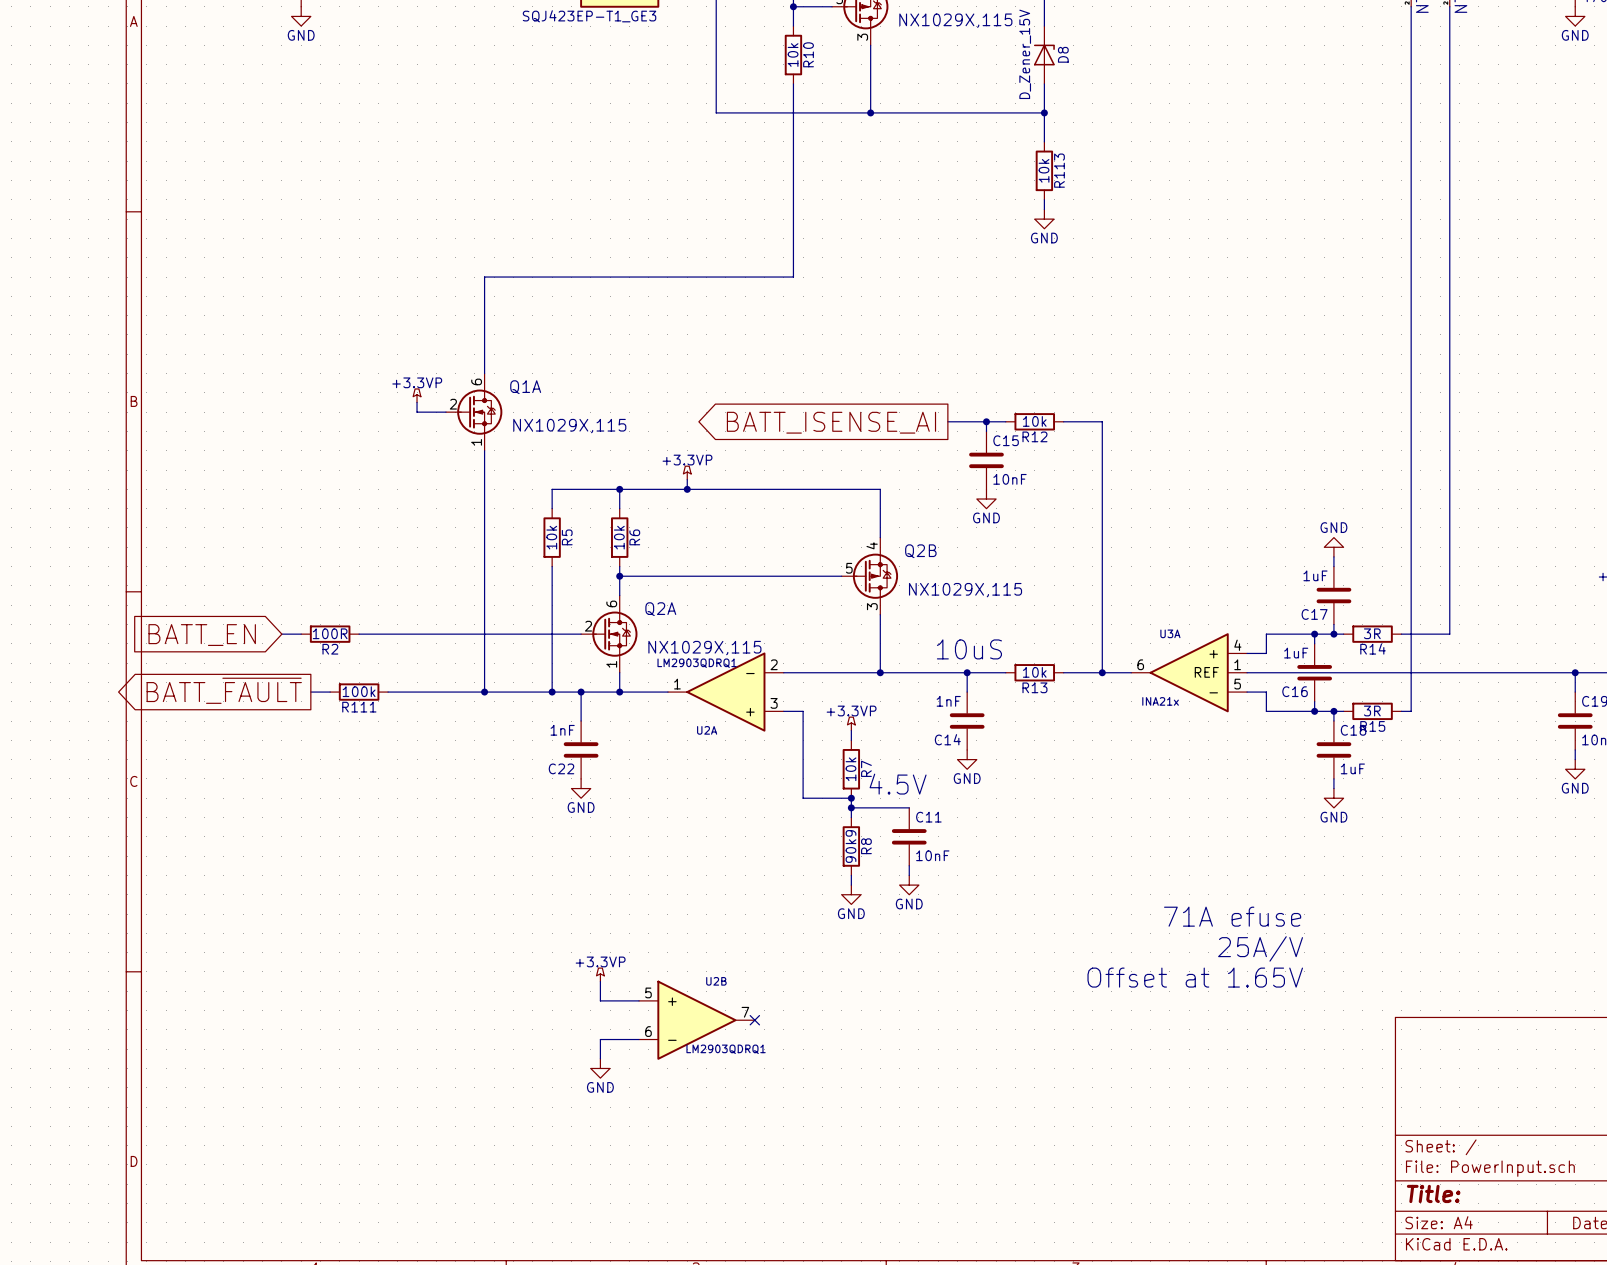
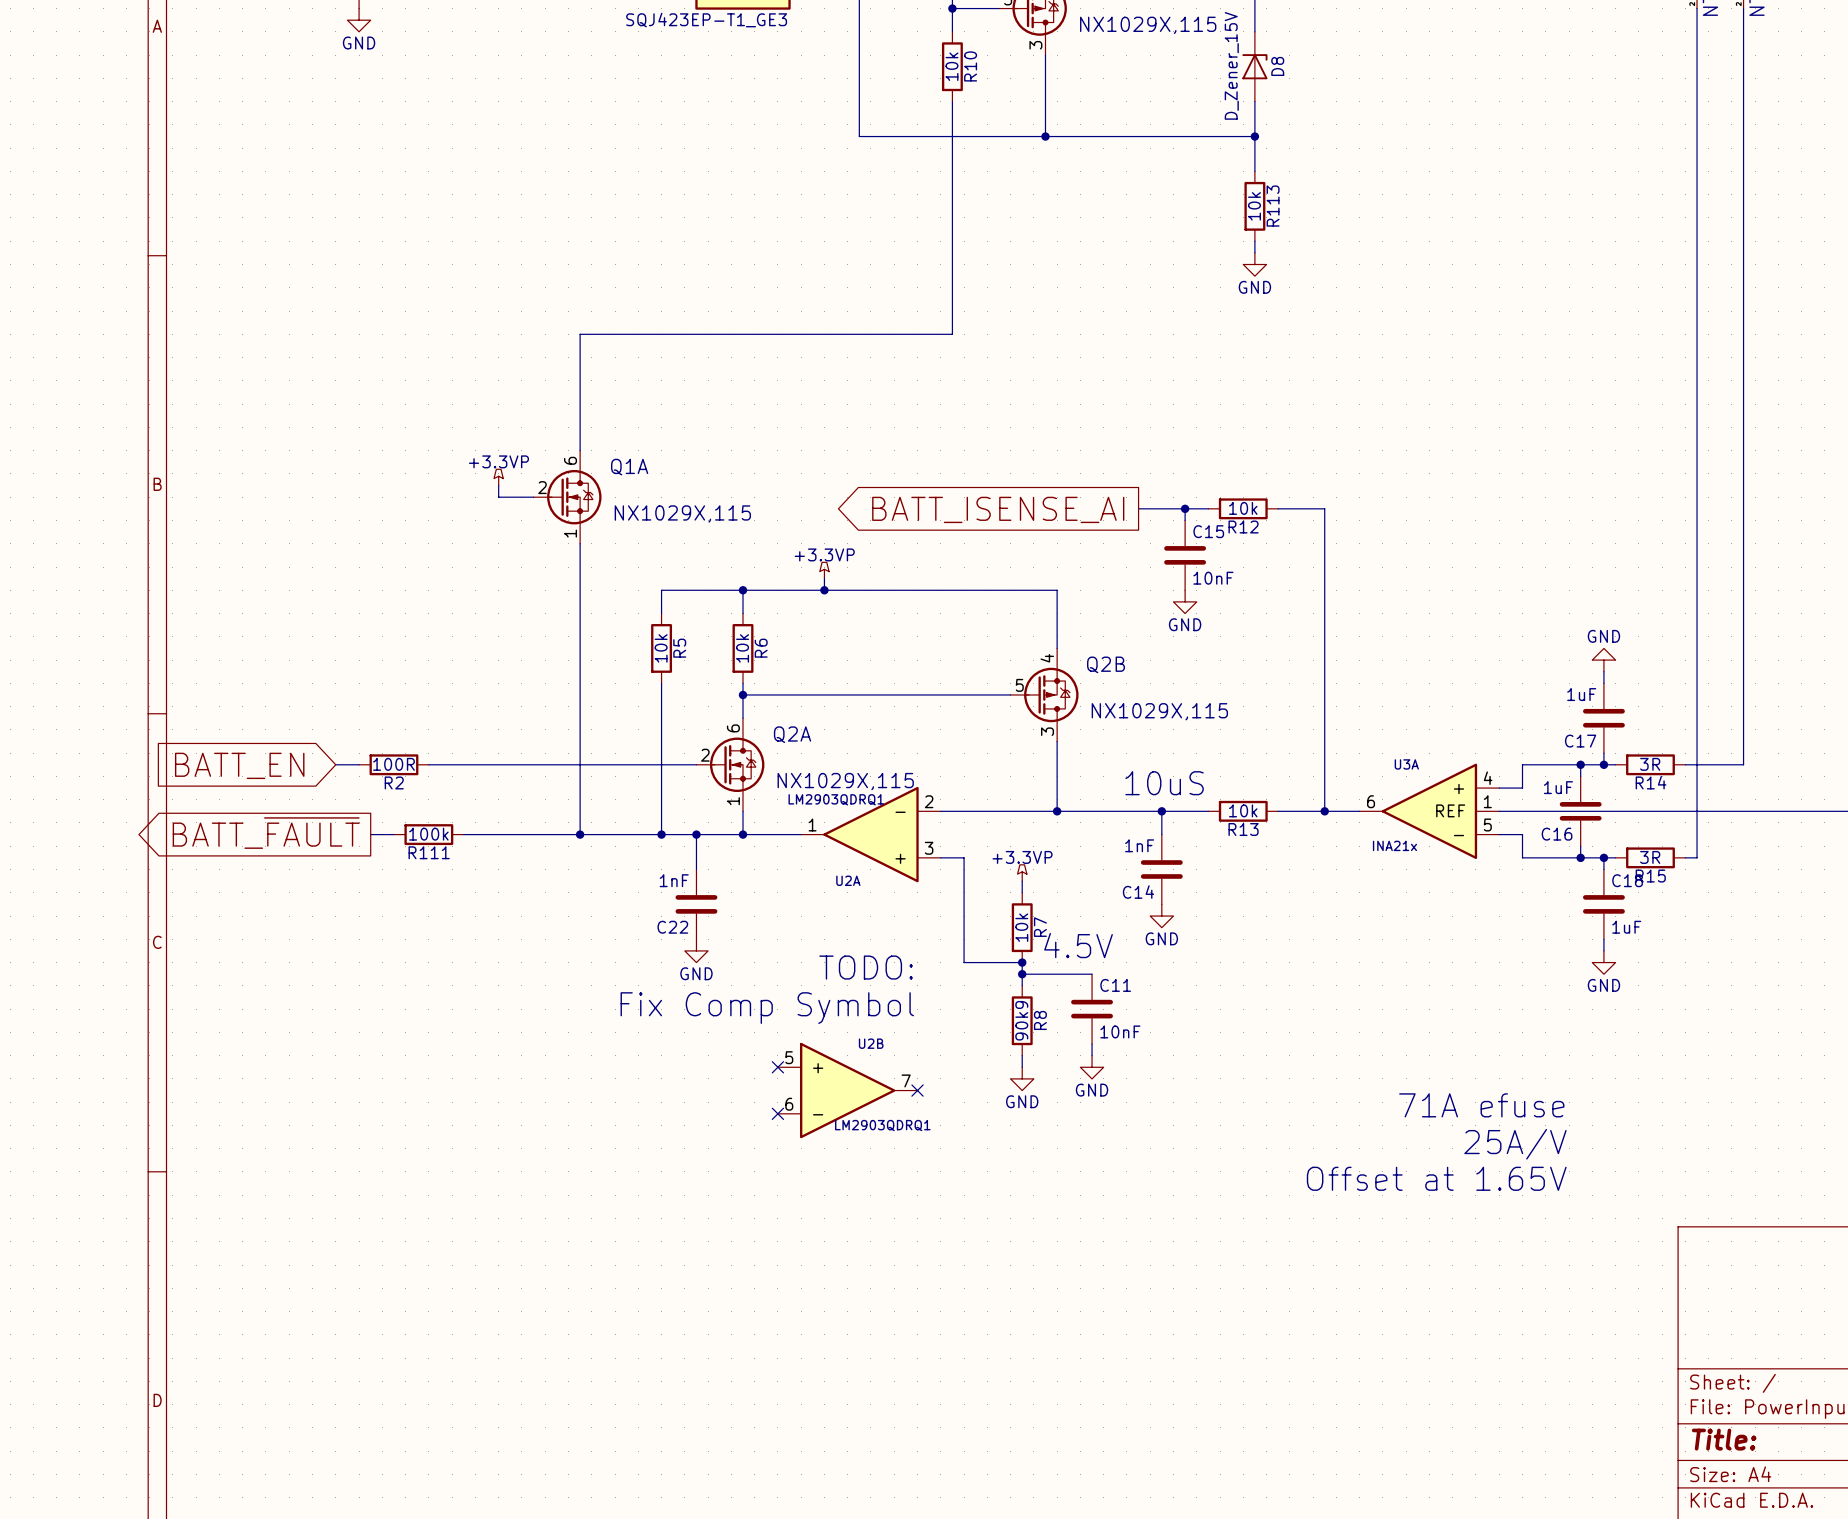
text: none -> TODO: (866, 967)
text: none -> Fix Comp Symbol (767, 1008)
no-connect mark: none -> (777, 1067)
no-connect mark: none -> (917, 1090)
no-connect mark: none -> (777, 1113)
power symbol: +3.3VP (600, 974) -> none
wire: (600, 981) (600, 1000) (639, 1000) -> none
U2B position: (696, 1020) -> (847, 1090)
no-connect mark: (754, 1020) -> none
wire: (639, 1039) (600, 1039) (600, 1058) -> none
power symbol: GND (600, 1068) -> none

